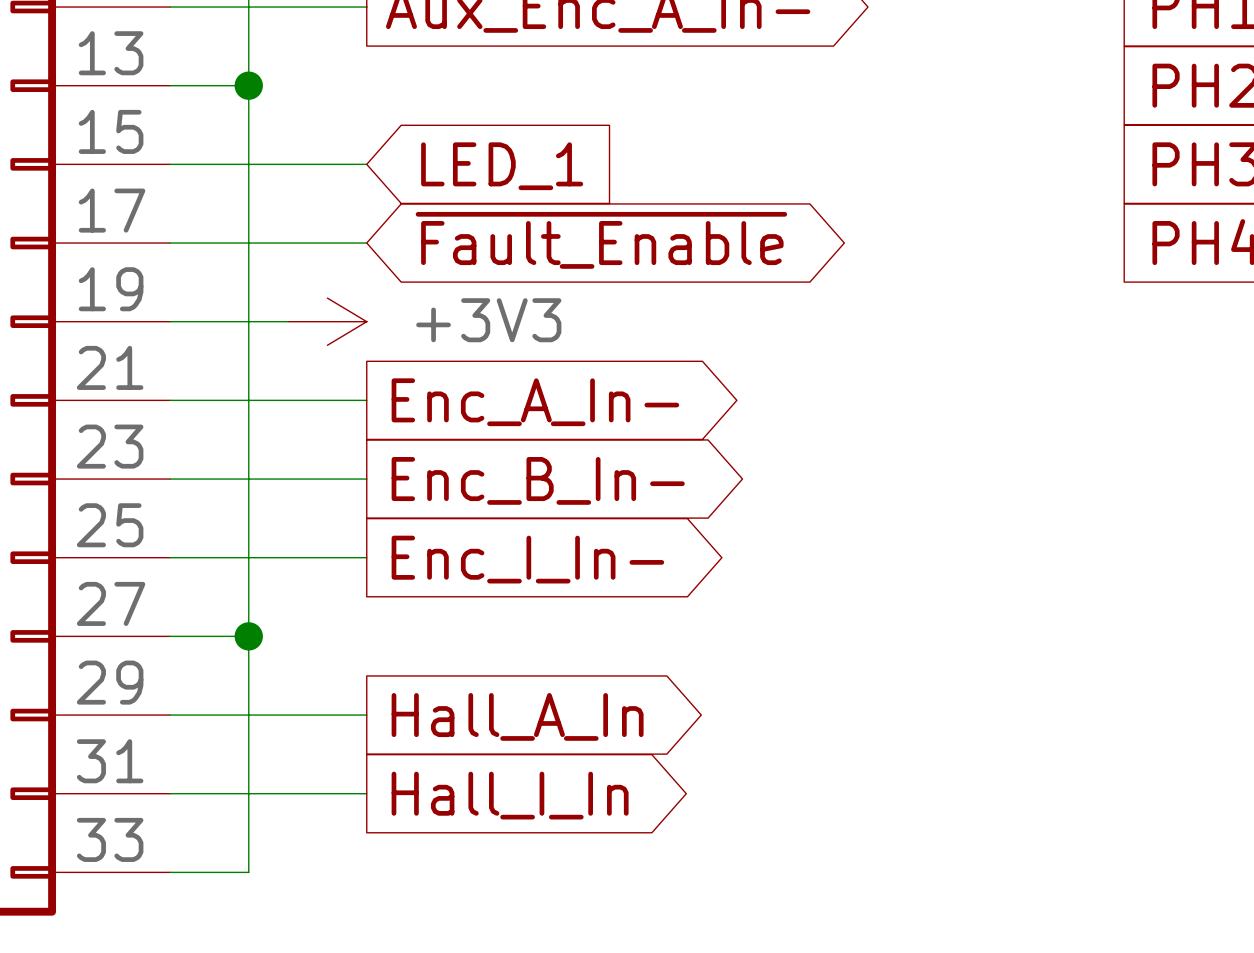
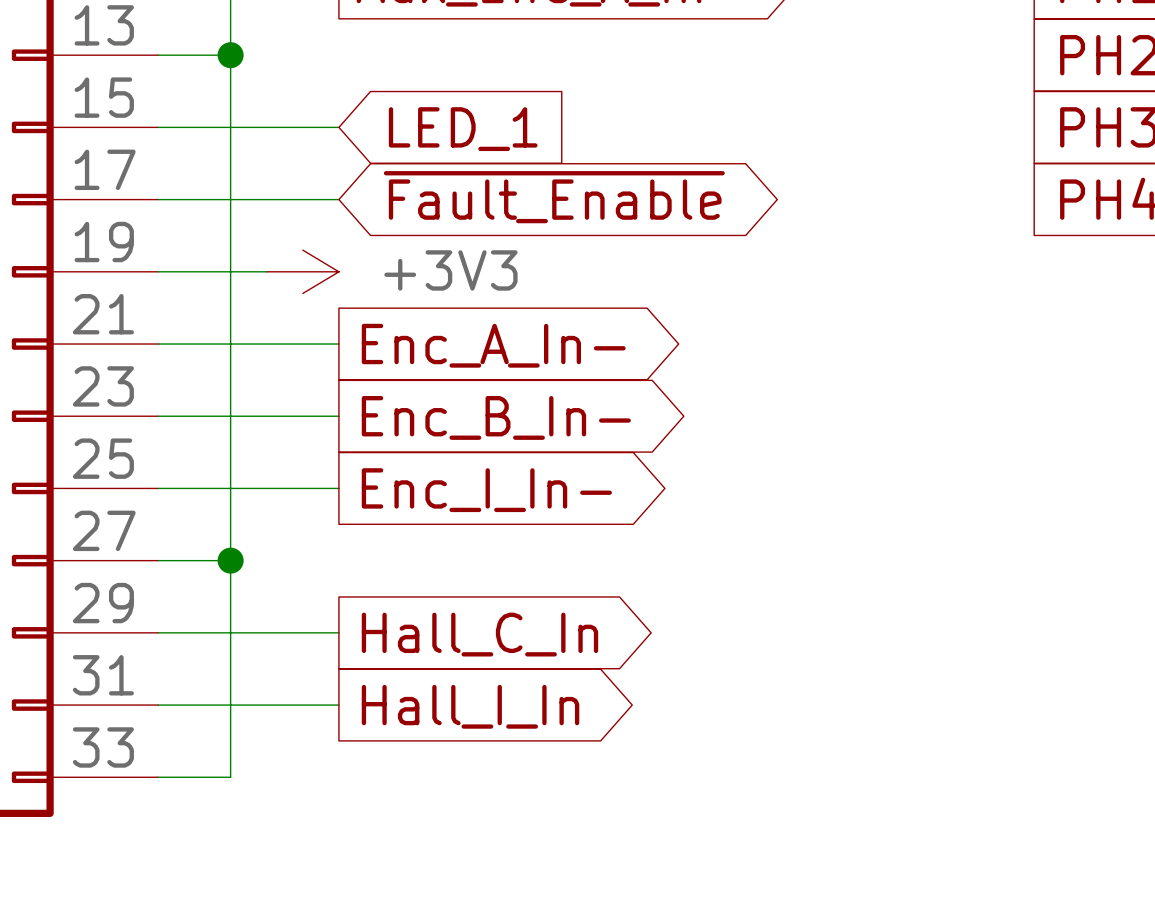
global label: Hall_A_In (517, 716) -> Hall_C_In (479, 634)

